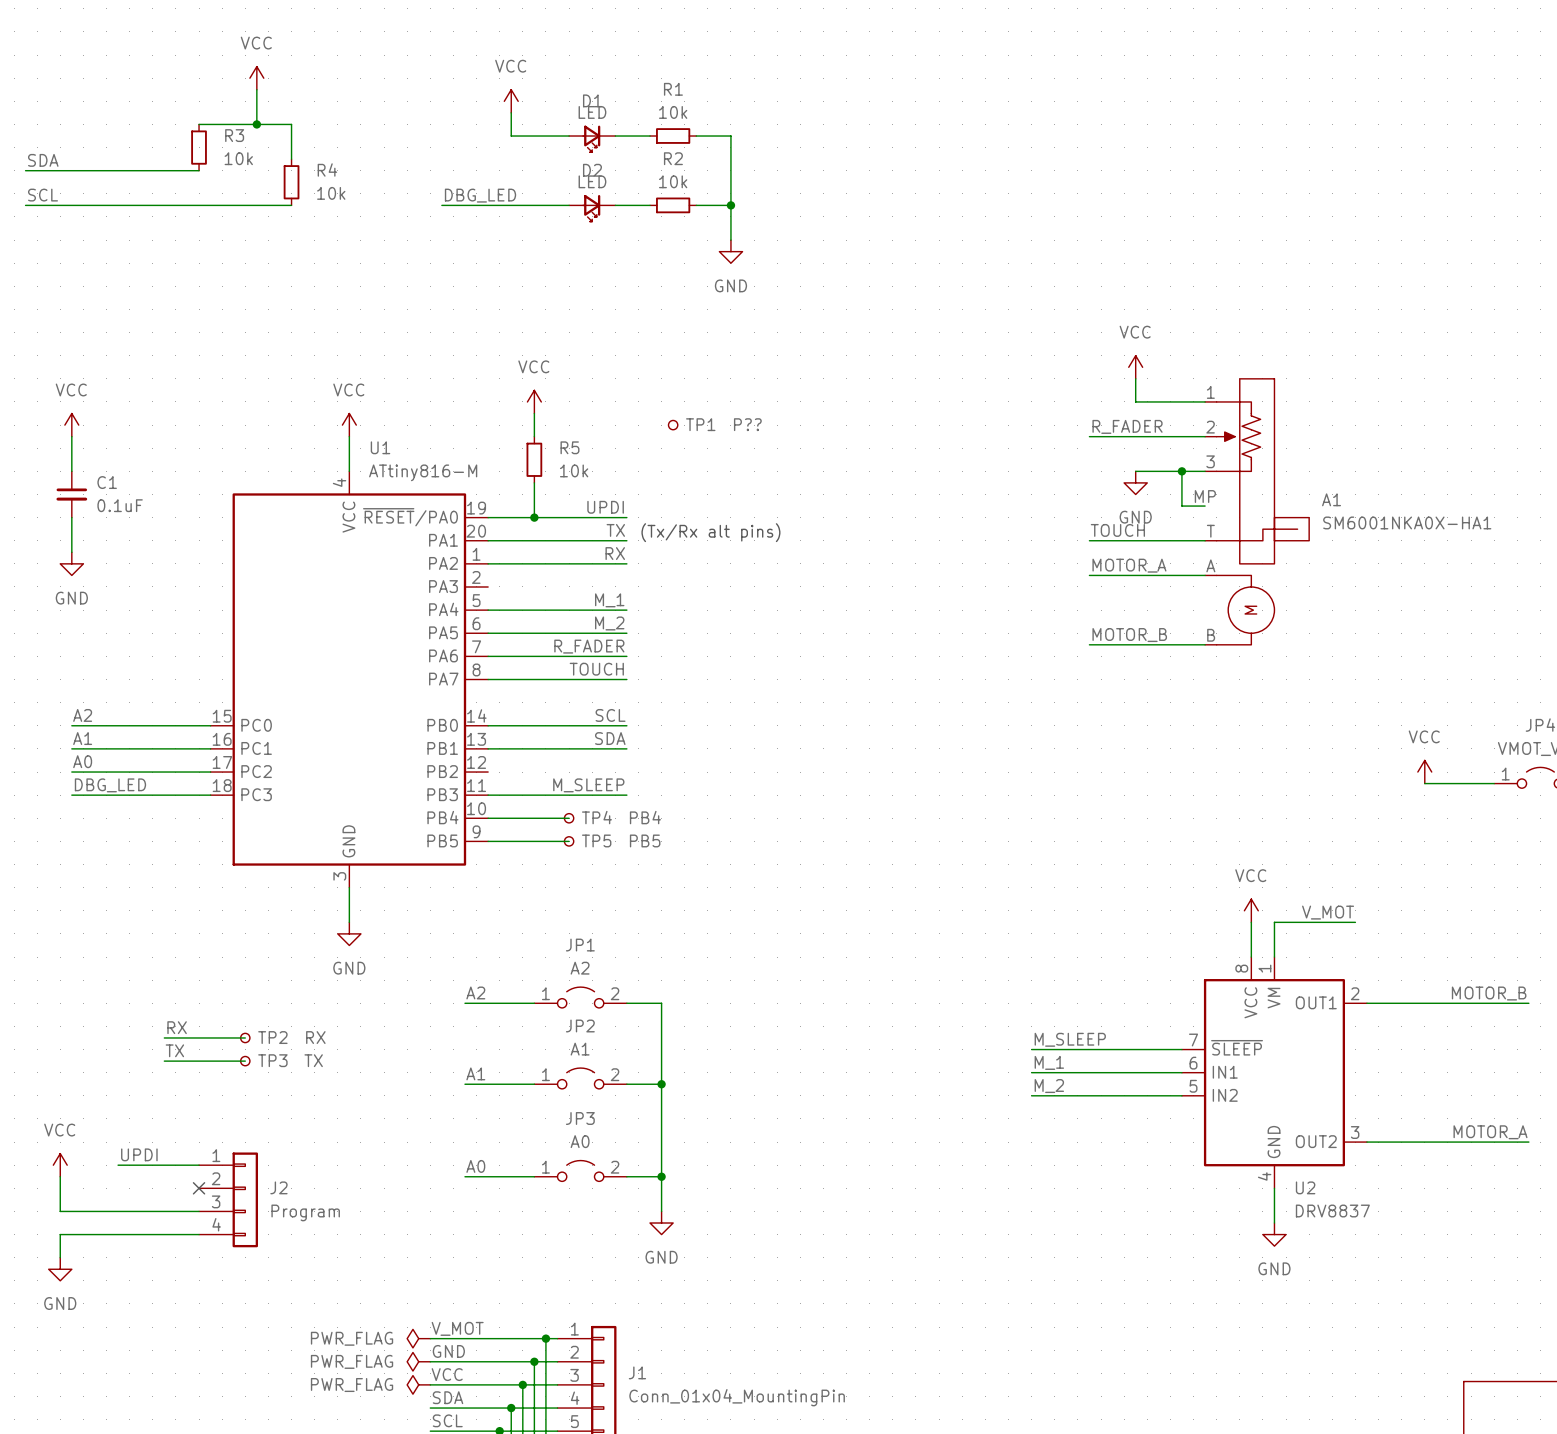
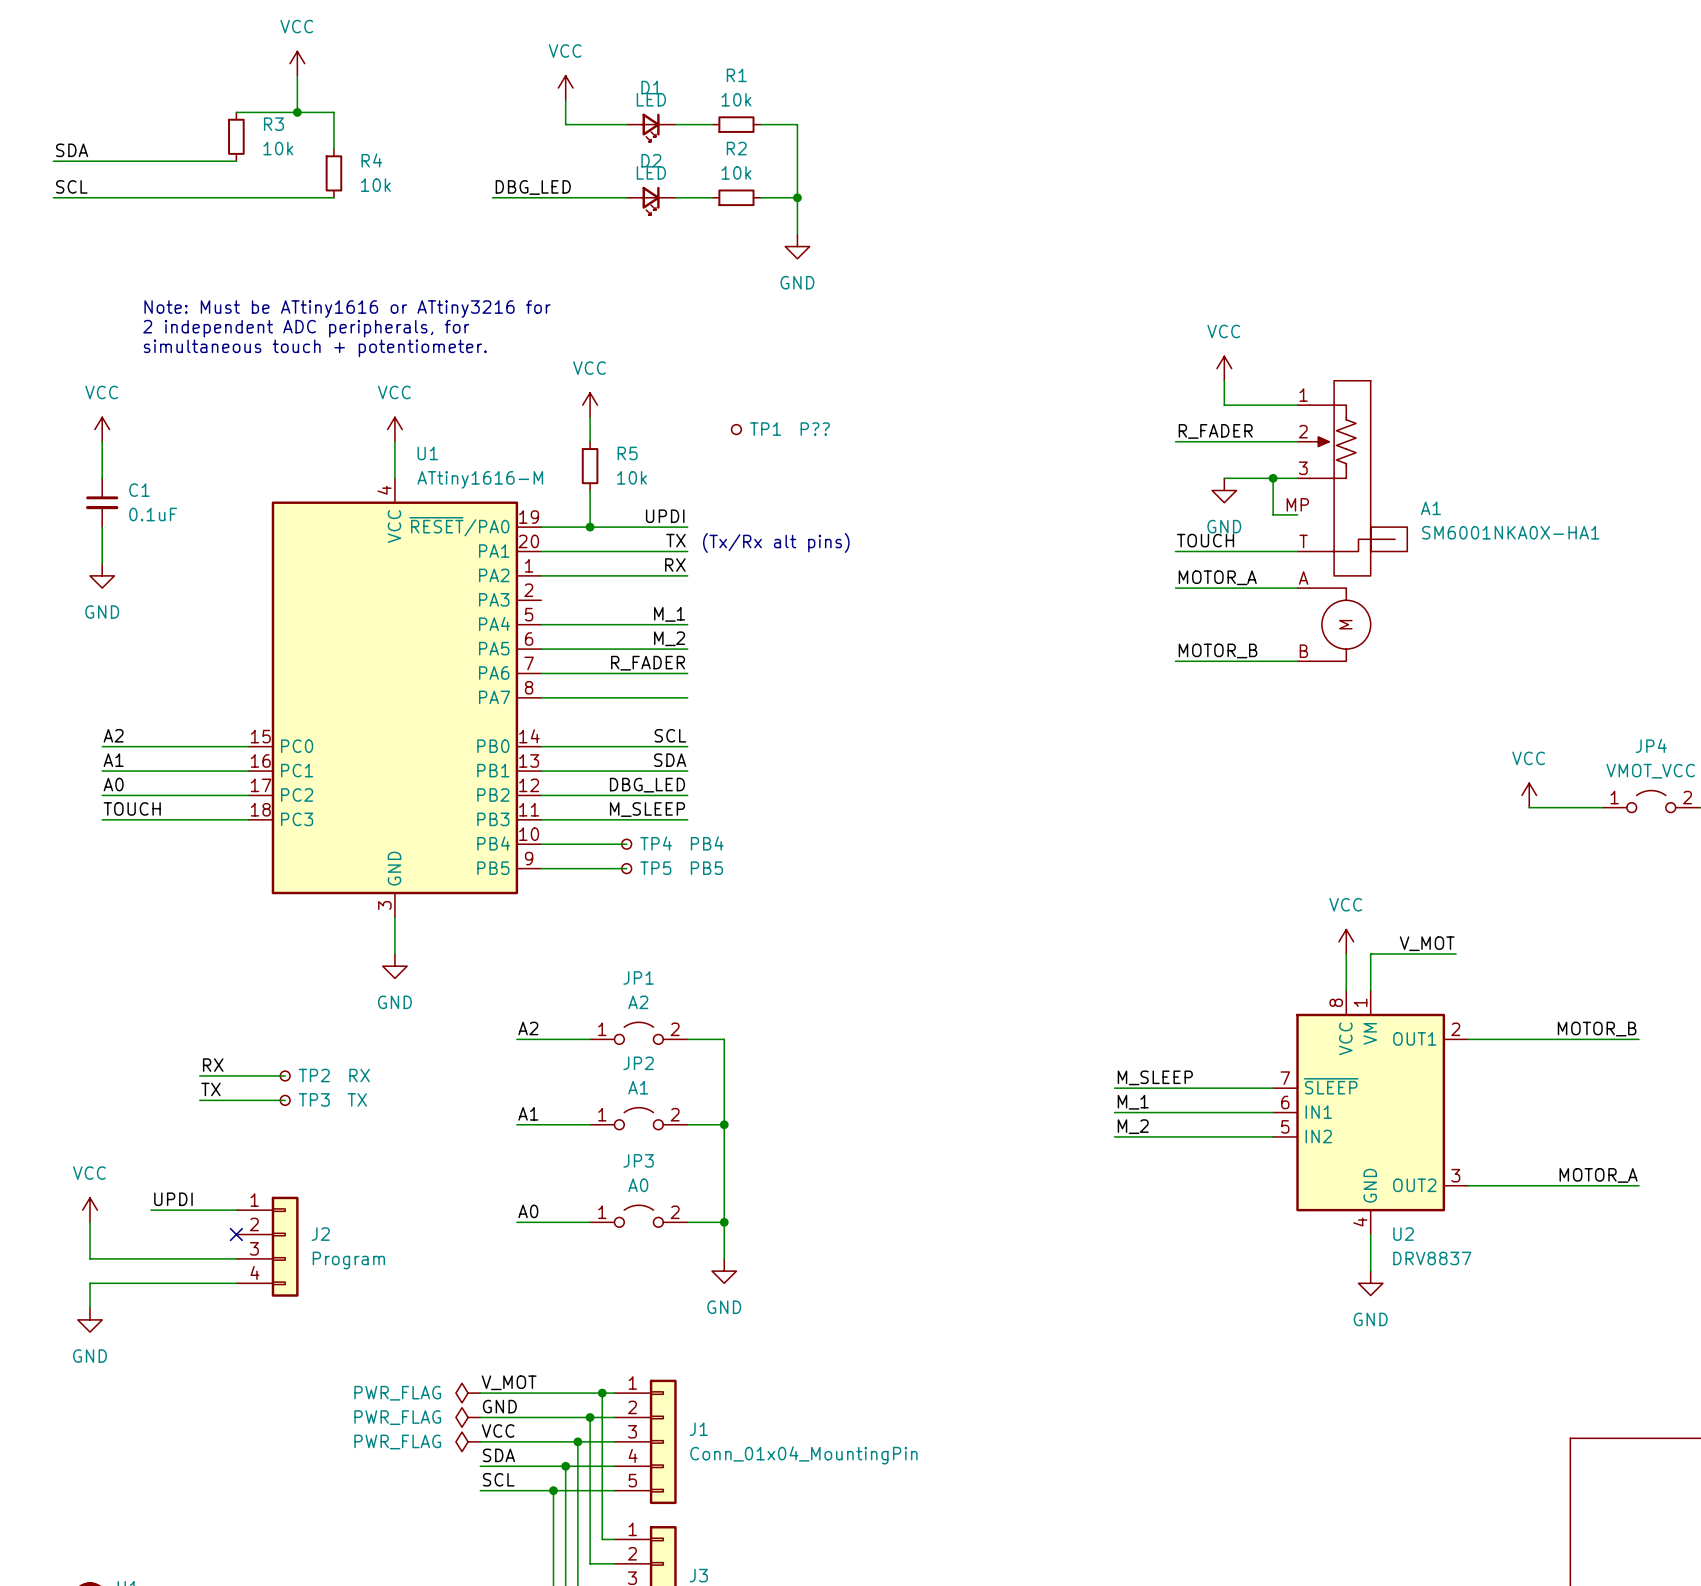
text: none -> Note: Must be ATtiny1616 or ATtiny3216 for (347, 309)
text: none -> 2 independent ADC peripherals, for (306, 328)
text: none -> simultaneous touch + potentiometer. (315, 348)
U1 value: ATtiny816-M (423, 472) -> ATtiny1616-M (480, 479)
label: TOUCH (596, 669) -> none
label: none -> DBG_LED (647, 785)
wire: none -> (541, 795) (687, 795)
label: DBG_LED (110, 785) -> TOUCH (132, 808)

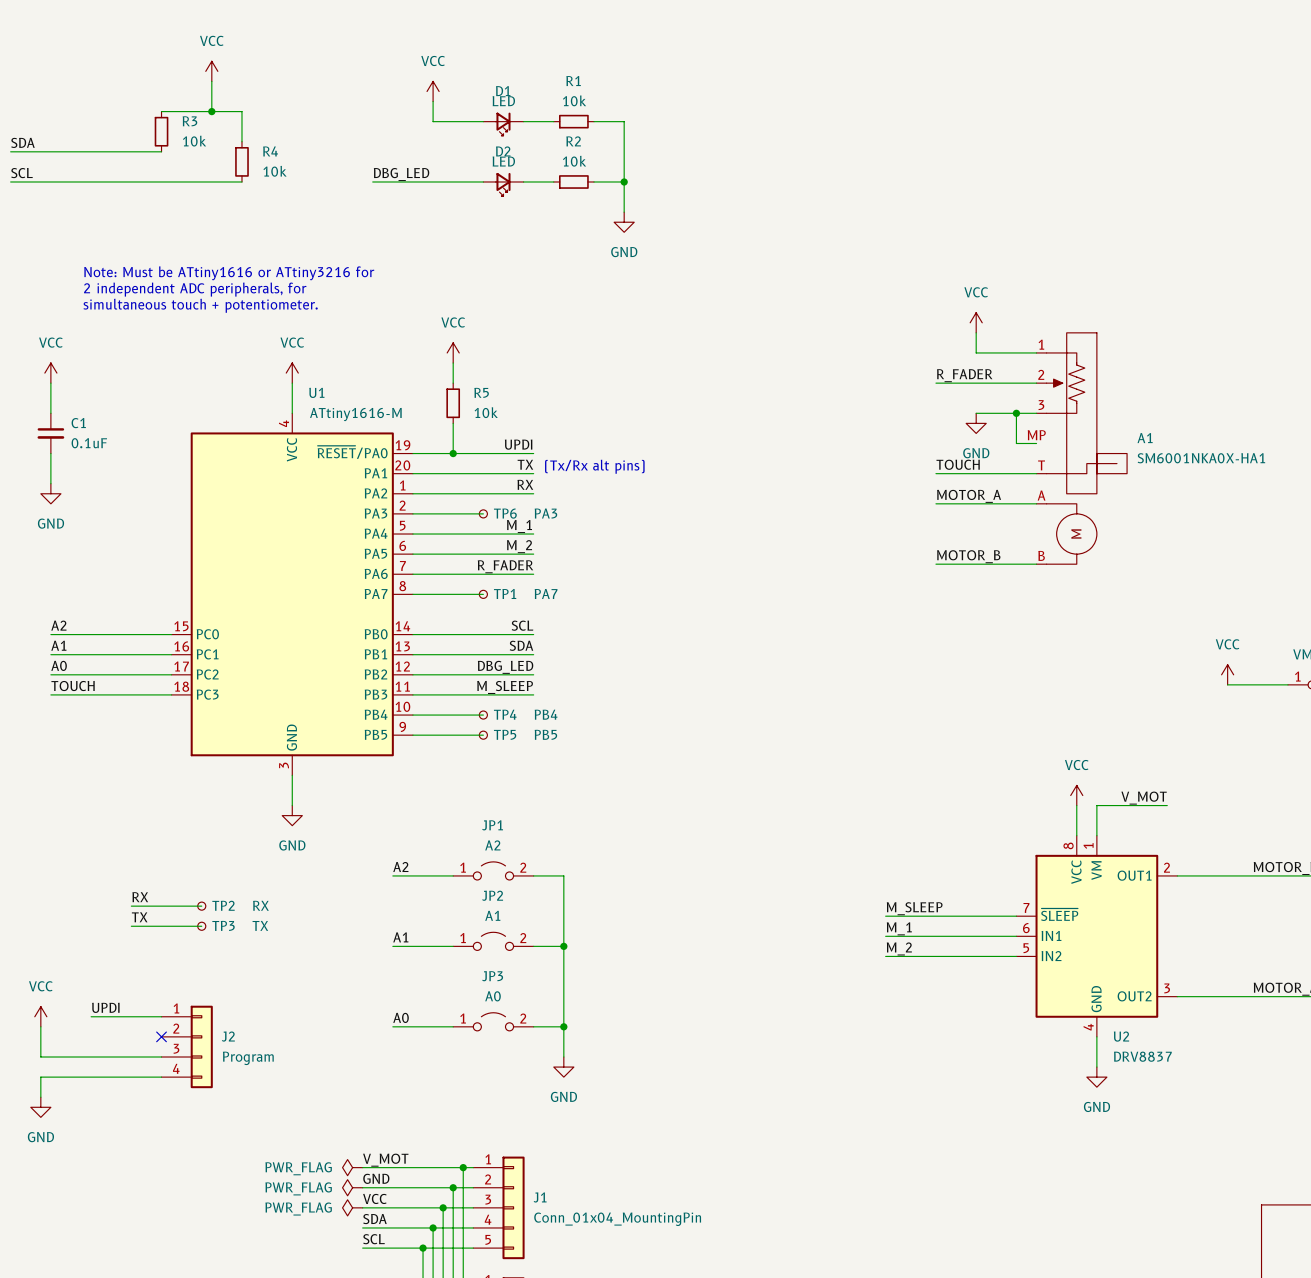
TP1 position: (736, 429) -> (483, 594)
TP1 value: P?? (815, 429) -> PA7 (546, 593)
wire: none -> (412, 513) (483, 513)
TP6: none -> PA3 (483, 513)
wire: (626, 697) (687, 697) -> none

